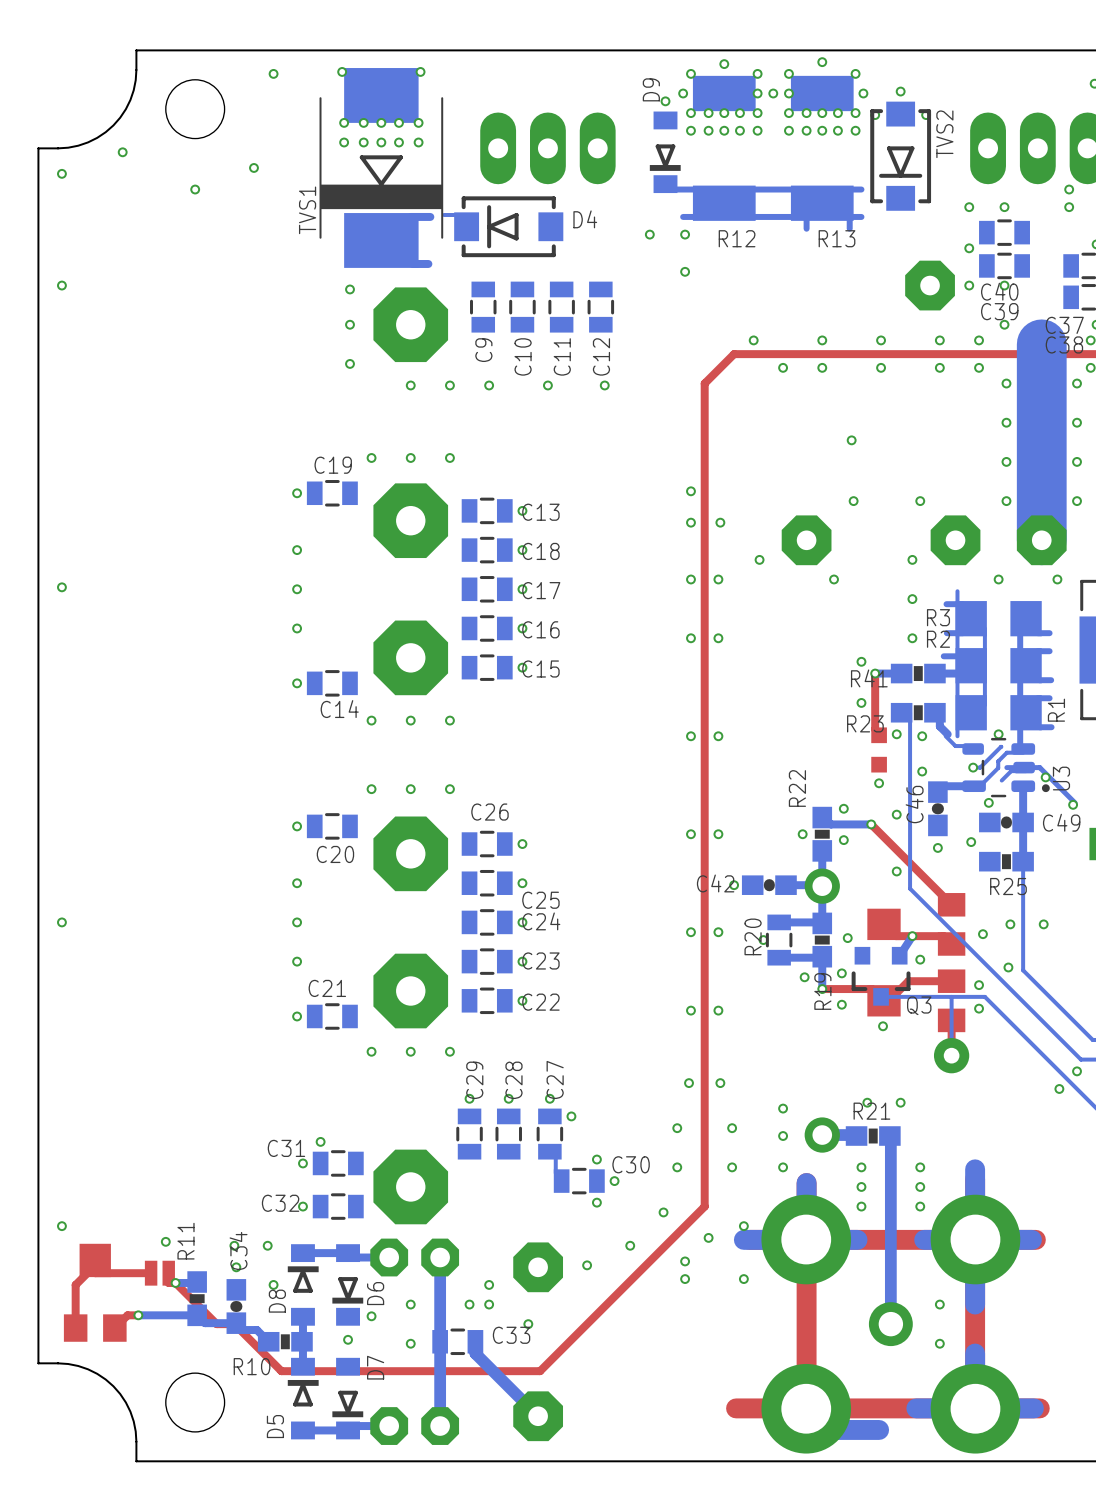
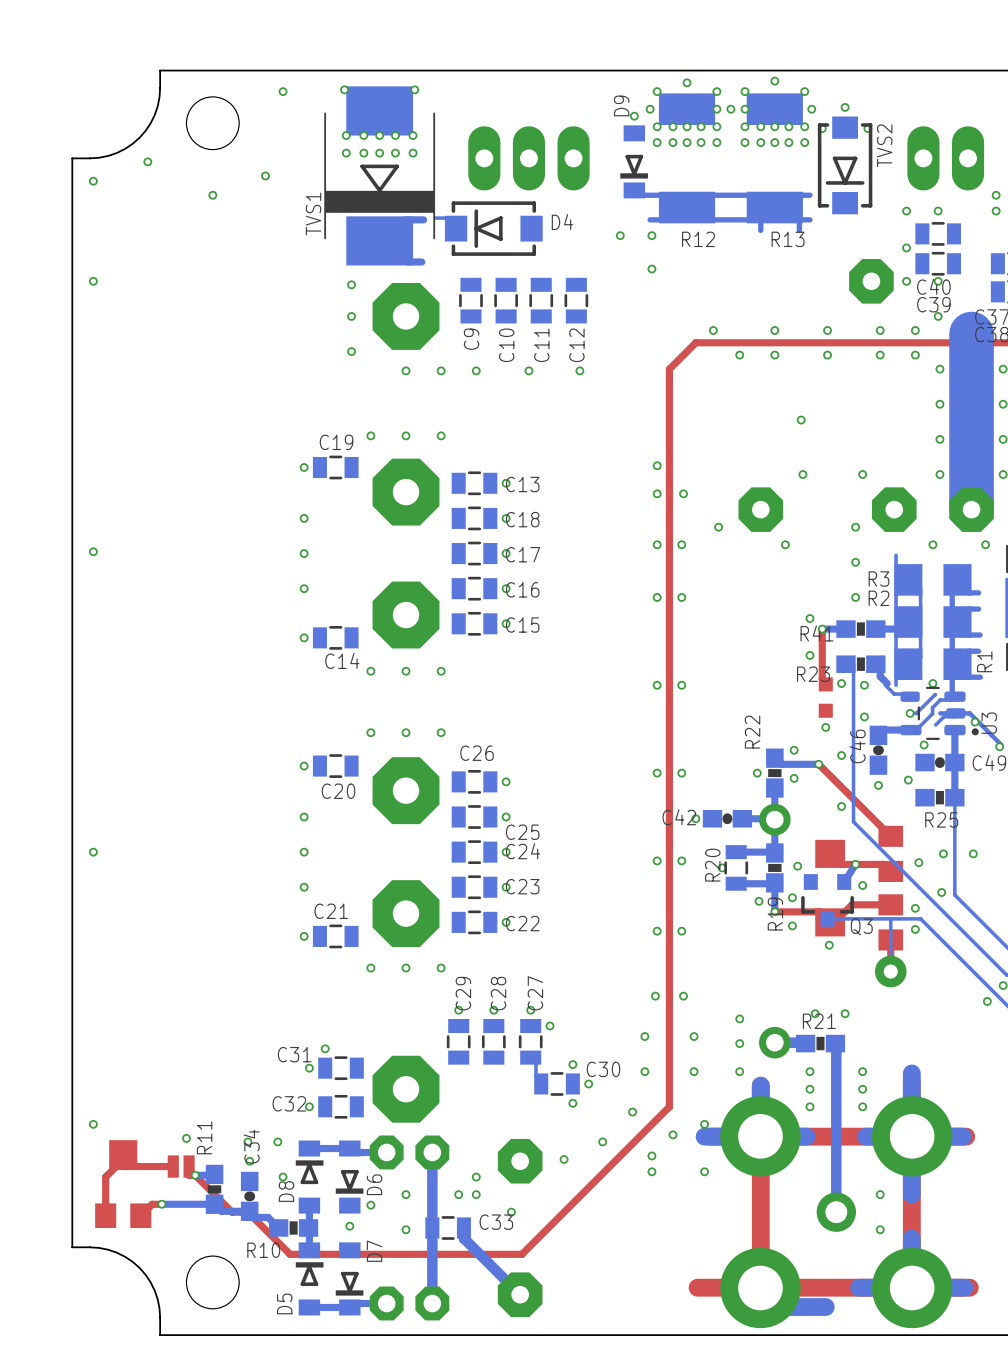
bottom track: (962, 604) (946, 604) -> none
bottom track: (962, 633) (946, 633) -> none
bottom track: (959, 656) (943, 656) -> none

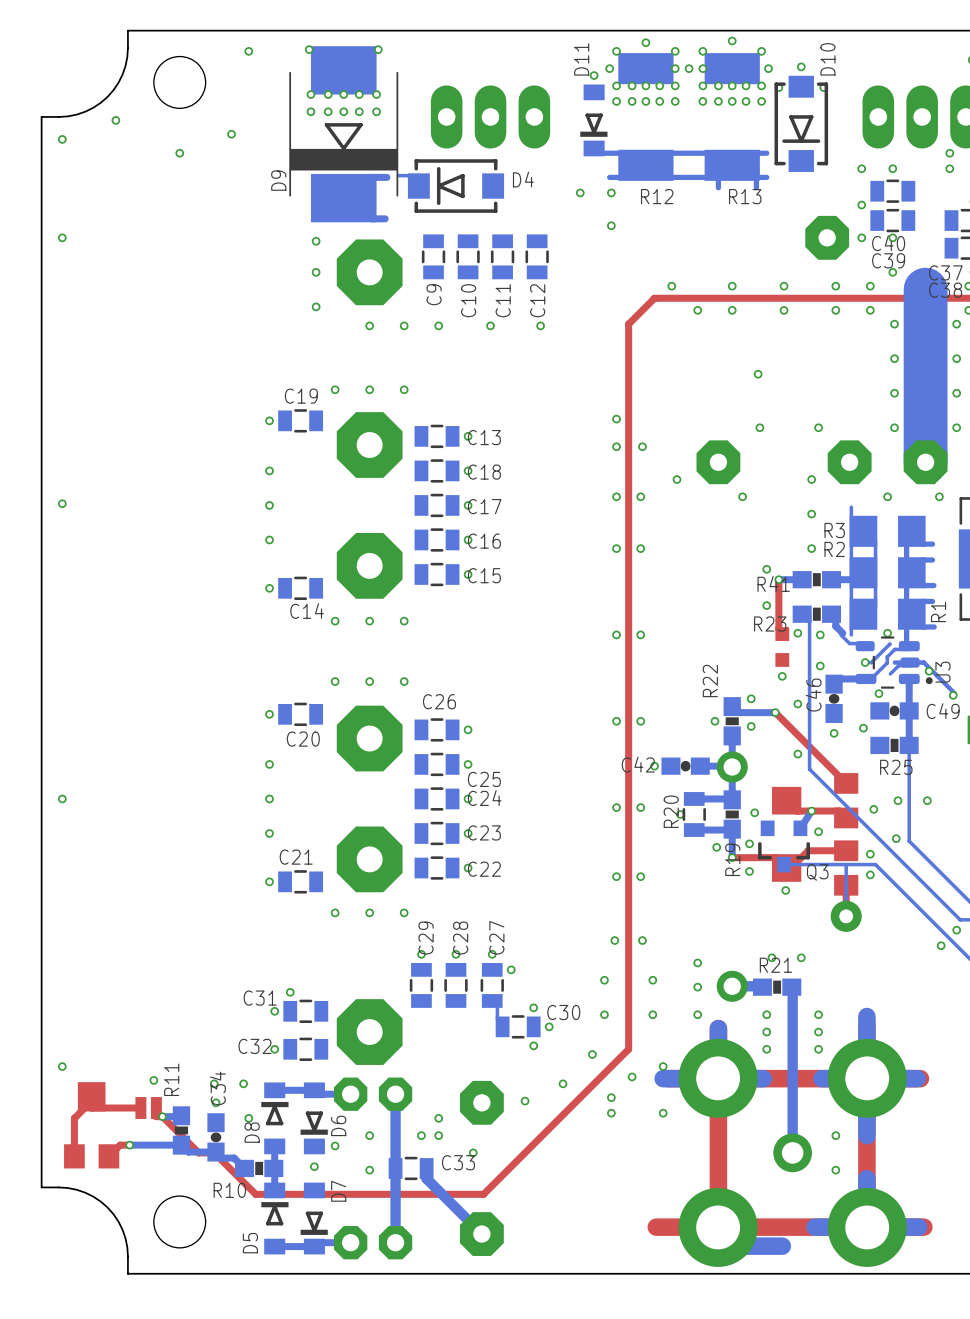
D9 name: D9 (621, 105) -> D11 (581, 59)
TVS2 name: TVS2 (884, 145) -> D10 (827, 59)
TVS1 name: TVS1 (313, 213) -> D9 (278, 180)

